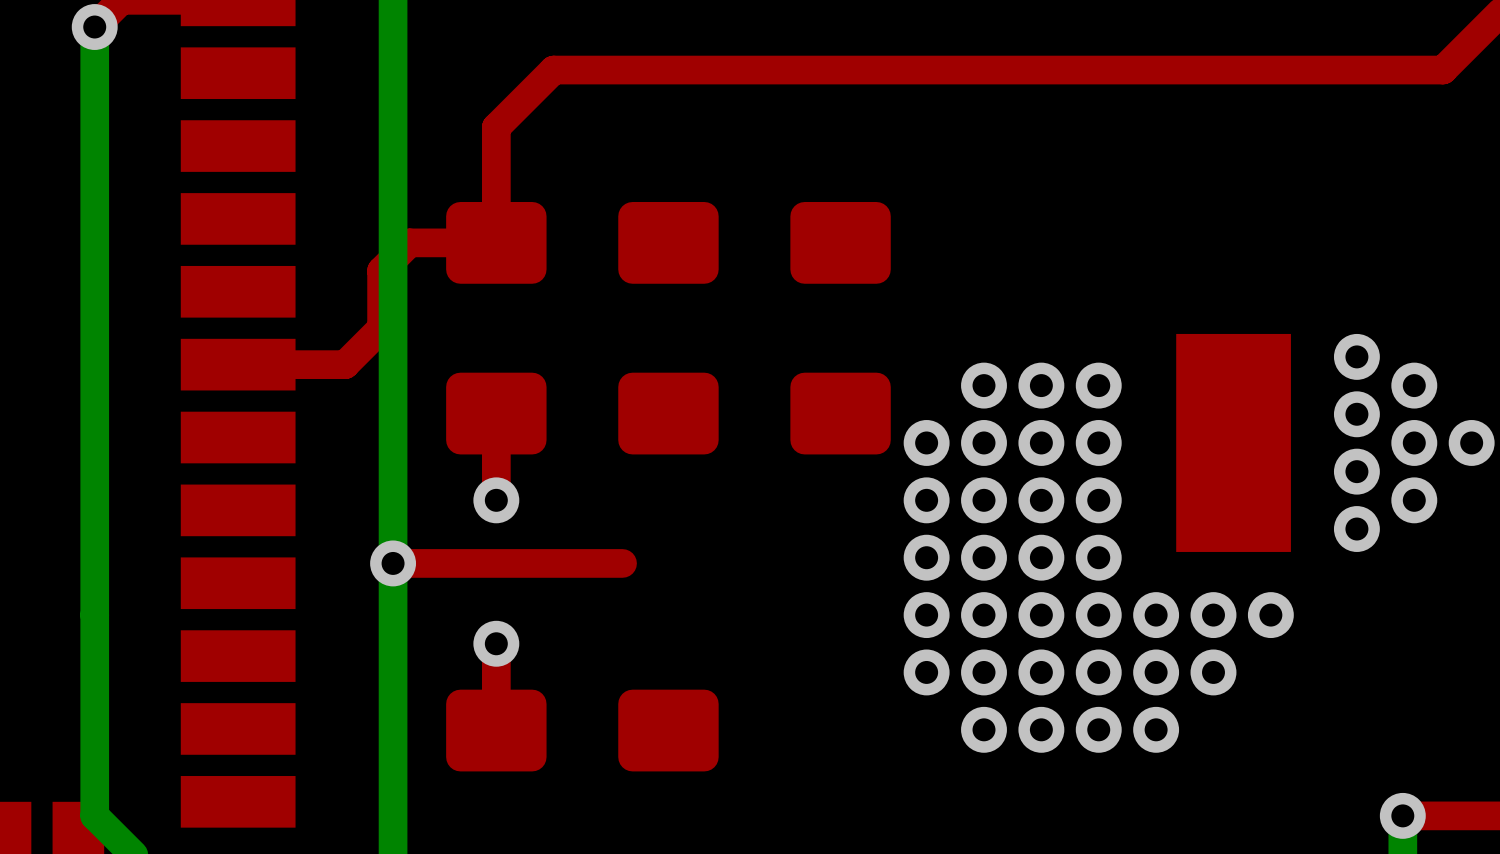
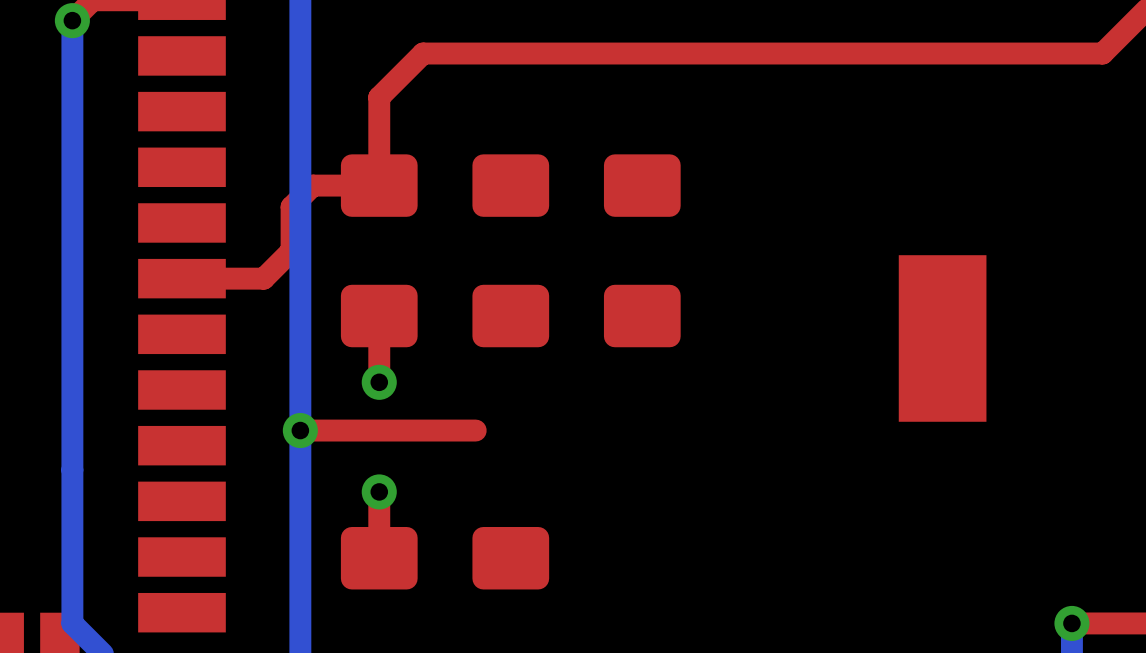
via: (1356, 356) -> none
via: (984, 385) -> none
via: (1041, 385) -> none
via: (1098, 385) -> none
via: (1414, 385) -> none
via: (1356, 414) -> none
via: (926, 442) -> none
via: (984, 442) -> none
via: (1041, 442) -> none
via: (1098, 442) -> none
via: (1414, 442) -> none
via: (1471, 442) -> none
via: (1356, 471) -> none
via: (926, 500) -> none
via: (984, 500) -> none
via: (1041, 500) -> none
via: (1098, 500) -> none
via: (1414, 500) -> none
via: (1356, 529) -> none
via: (926, 557) -> none
via: (984, 557) -> none
via: (1041, 557) -> none
via: (1098, 557) -> none
via: (926, 615) -> none
via: (984, 615) -> none
via: (1041, 615) -> none
via: (1098, 615) -> none
via: (1156, 615) -> none
via: (1213, 615) -> none
via: (1270, 615) -> none
via: (926, 672) -> none
via: (984, 672) -> none
via: (1041, 672) -> none
via: (1098, 672) -> none
via: (1156, 672) -> none
via: (1213, 672) -> none
via: (984, 729) -> none
via: (1041, 729) -> none
via: (1098, 729) -> none
via: (1156, 729) -> none

